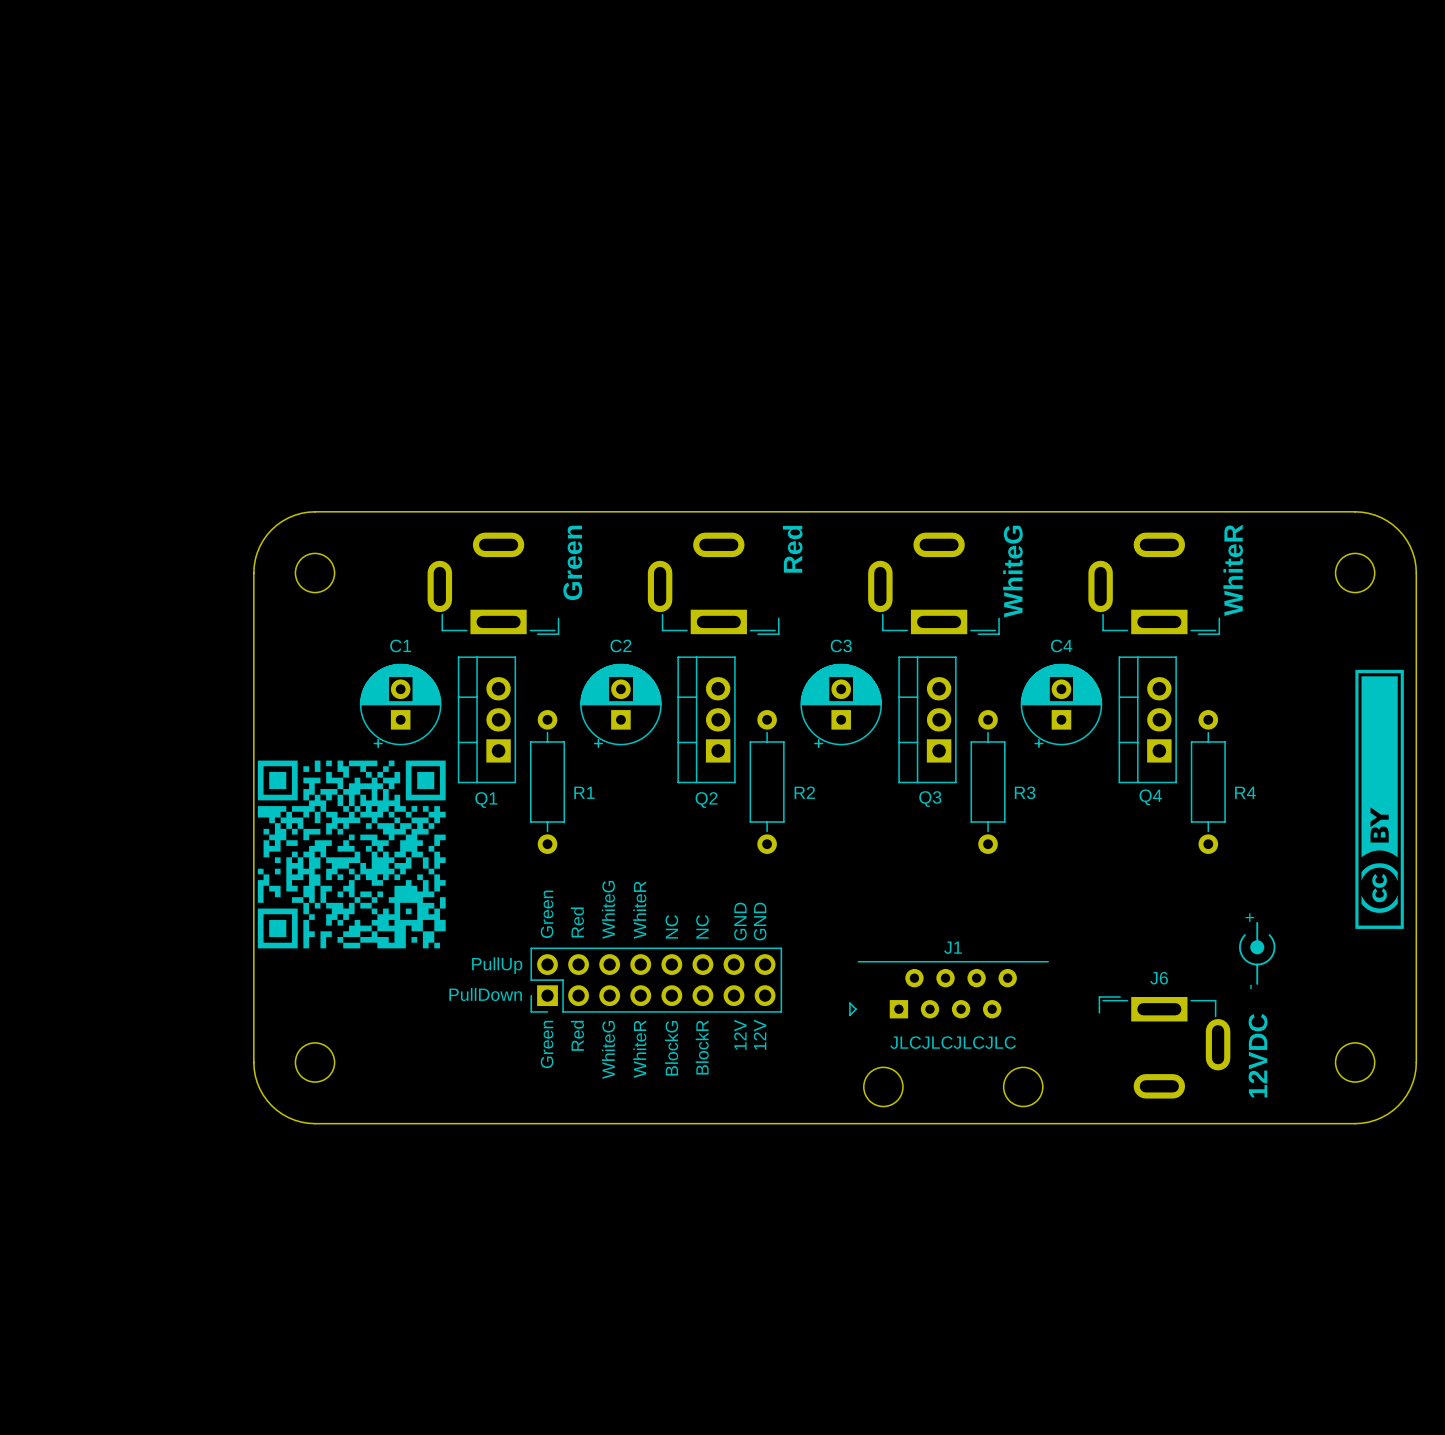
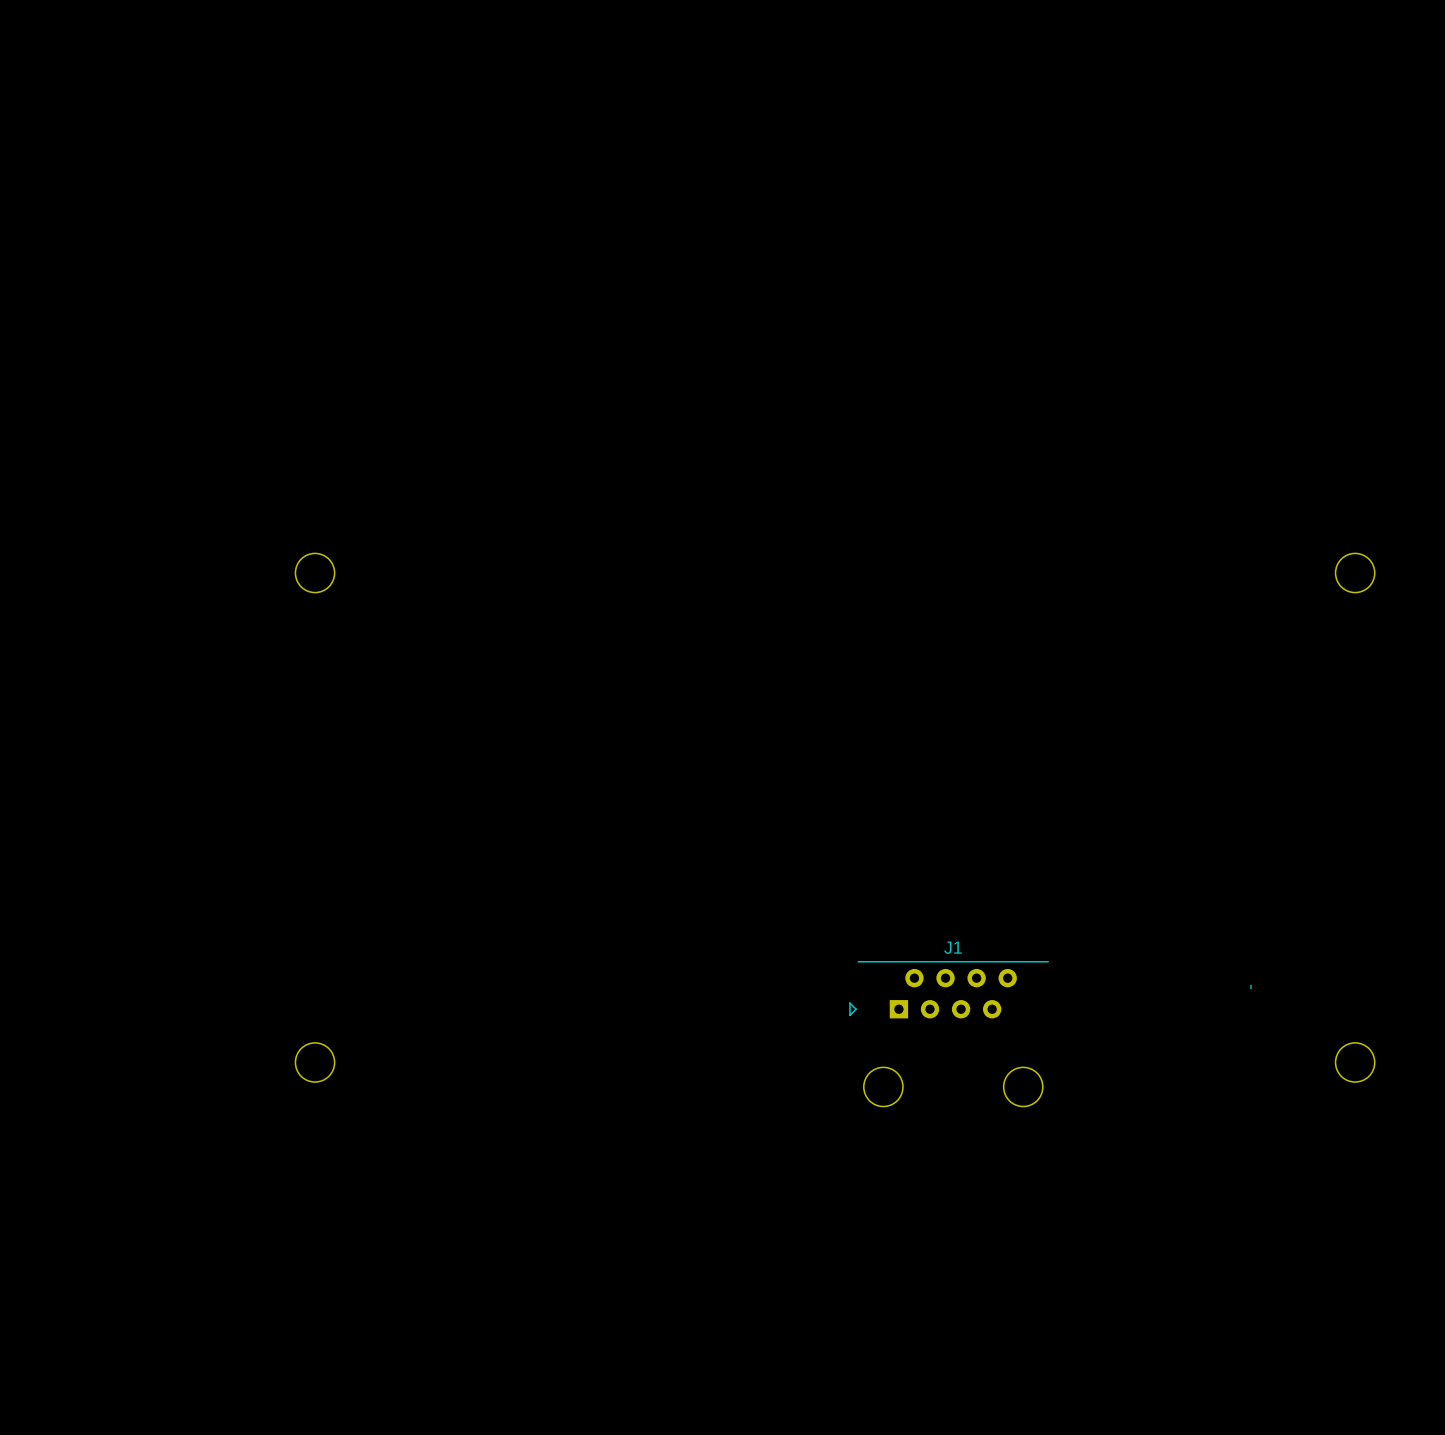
board edge: (315, 511) (1355, 511) (1368, 513) (1381, 517) (1393, 525) (1406, 540) (1414, 559) (1416, 572) (1416, 1062) (1414, 1076) (1410, 1089) (1402, 1100) (1387, 1114) (1375, 1120) (1355, 1123) (315, 1123) (301, 1122) (288, 1117) (276, 1110) (267, 1100) (259, 1089) (254, 1069) (253, 572) (255, 559) (259, 546) (271, 529) (282, 521) (294, 515) (315, 511) -> none
text: Red (792, 549) -> none
text: Green (572, 562) -> none
text: WhiteR (1233, 570) -> none
text: WhiteG (1012, 571) -> none
part: (493, 583) -> none
part: (713, 583) -> none
part: (933, 583) -> none
part: (1154, 583) -> none
drawing: [1355, 669, 1404, 929] -> none
C1: (400, 705) -> none
C2: (620, 705) -> none
C3: (841, 705) -> none
C4: (1061, 705) -> none
Q1: (486, 719) -> none
Q2: (706, 719) -> none
Q3: (927, 719) -> none
Q4: (1147, 719) -> none
drawing: [257, 760, 446, 949] -> none
R1: (547, 782) -> none
R2: (767, 782) -> none
R3: (988, 782) -> none
R4: (1208, 782) -> none
text: WhiteG (608, 909) -> none
text: WhiteR (639, 910) -> none
text: Green (547, 914) -> none
text: + (1249, 917) -> none
text: GND (740, 921) -> none
text: GND (760, 921) -> none
text: Red (577, 922) -> none
line: (1257, 922) (1257, 947) -> none
text: NC (671, 926) -> none
text: NC (702, 926) -> none
line: (1245, 935) (1240, 944) (1241, 954) (1247, 961) (1257, 964) (1265, 962) (1272, 954) (1274, 944) (1269, 935) -> none
drawing: [1250, 940, 1265, 955] -> none
line: (1257, 964) (1257, 983) -> none
text: PullUp (497, 965) -> none
part: (656, 980) -> none
text: PullDown (485, 994) -> none
text: 12V (740, 1034) -> none
text: 12V (760, 1034) -> none
text: Red (577, 1035) -> none
text: JLCJLCJLCJLC (953, 1042) -> none
text: Green (547, 1044) -> none
text: BlockR (702, 1047) -> none
J6: (1164, 1047) -> none
text: BlockG (671, 1048) -> none
text: WhiteG (608, 1049) -> none
text: WhiteR (639, 1049) -> none
text: 12VDC (1258, 1055) -> none

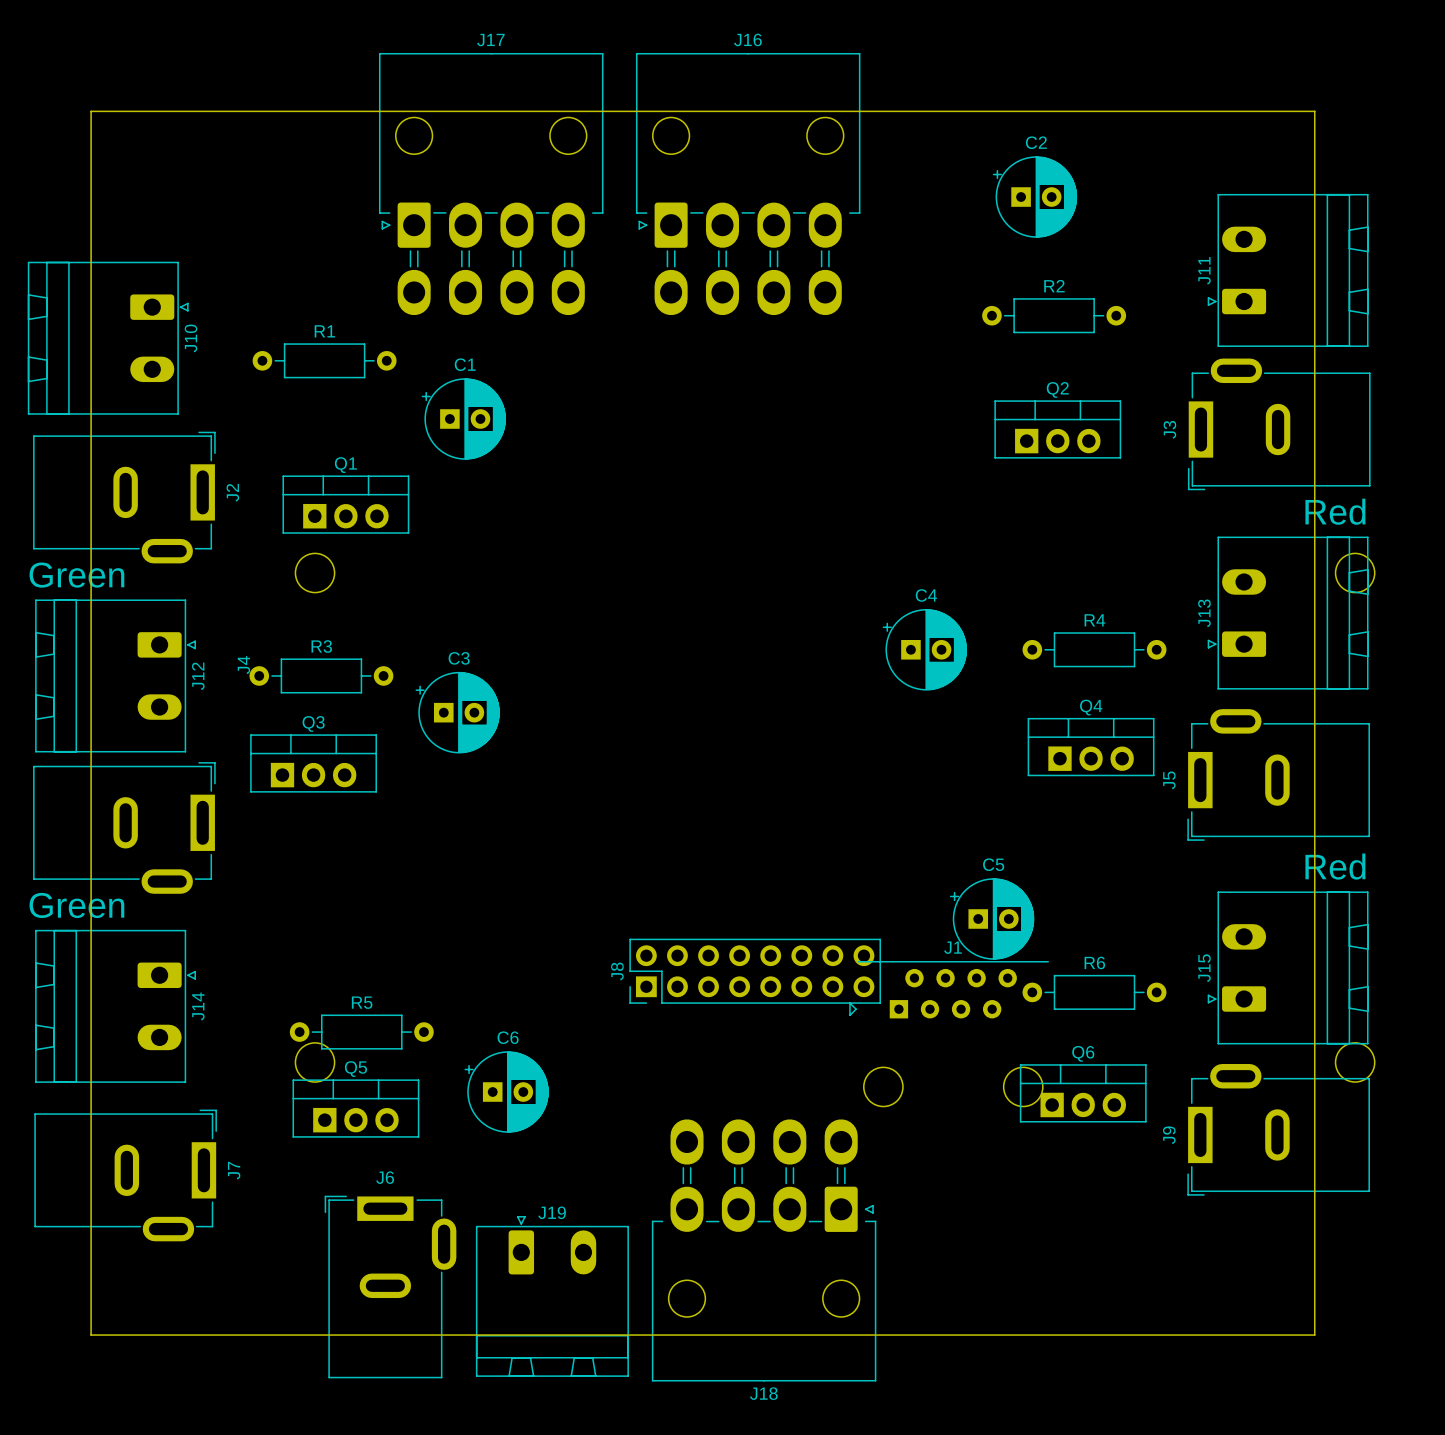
board edge: none -> (91, 111) (91, 1335) (1314, 1335) (1314, 111) (91, 111)
J17: none -> (491, 184)
J16: none -> (748, 184)
C2: none -> (1034, 197)
J11: none -> (1288, 270)
R2: none -> (1054, 315)
J10: none -> (108, 338)
R1: none -> (324, 360)
C1: none -> (463, 419)
J3: none -> (1279, 424)
Q2: none -> (1057, 429)
J2: none -> (124, 497)
Q1: none -> (345, 504)
text: none -> Red (1335, 511)
text: none -> Green (76, 575)
J13: none -> (1288, 613)
C4: none -> (924, 649)
R4: none -> (1094, 649)
J12: none -> (115, 675)
R3: none -> (321, 675)
C3: none -> (457, 712)
Q4: none -> (1091, 747)
Q3: none -> (313, 763)
J5: none -> (1278, 774)
J4: none -> (124, 827)
text: none -> Red (1335, 866)
text: none -> Green (76, 905)
C5: none -> (992, 918)
J15: none -> (1288, 967)
J8: none -> (755, 971)
text: - (1251, 986) -> none
R6: none -> (1094, 992)
J14: none -> (115, 1006)
R5: none -> (361, 1032)
C6: none -> (506, 1092)
Q6: none -> (1083, 1093)
Q5: none -> (355, 1108)
J9: none -> (1278, 1129)
J7: none -> (125, 1175)
J18: none -> (764, 1250)
J6: none -> (390, 1287)
J19: none -> (552, 1296)

